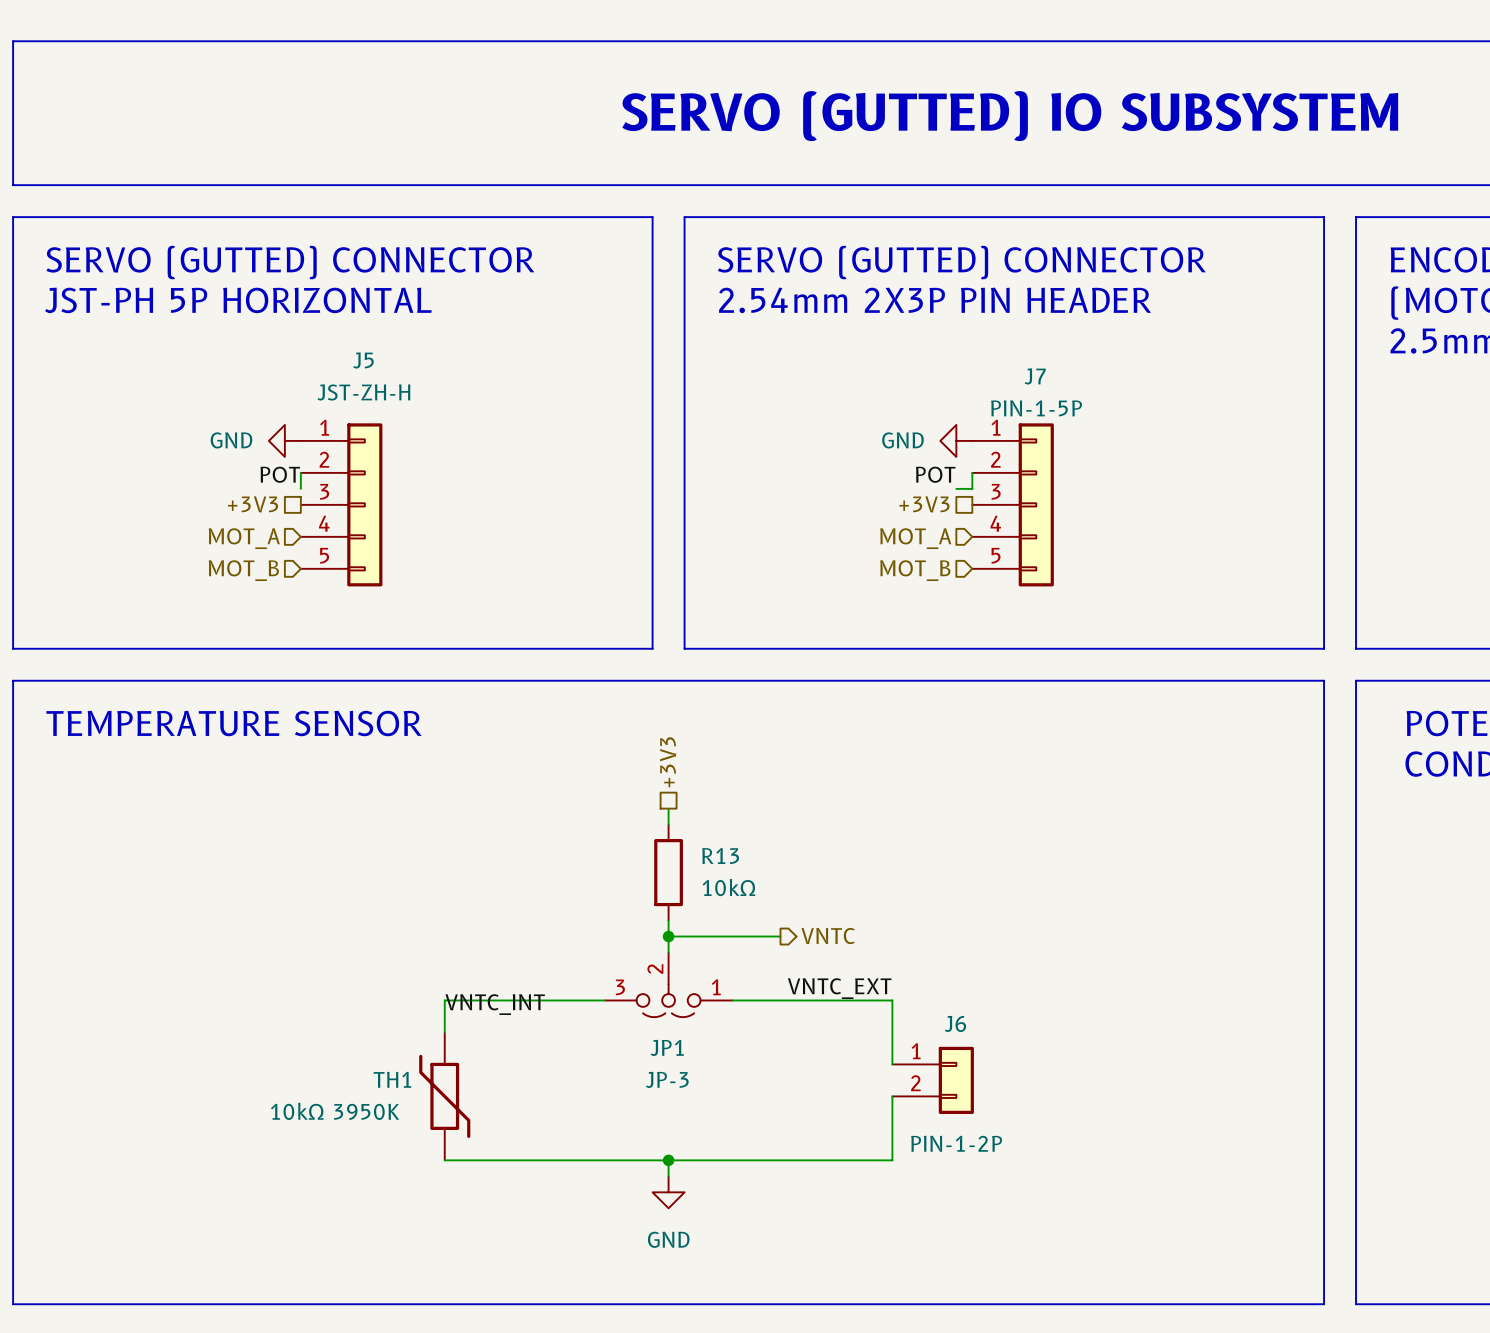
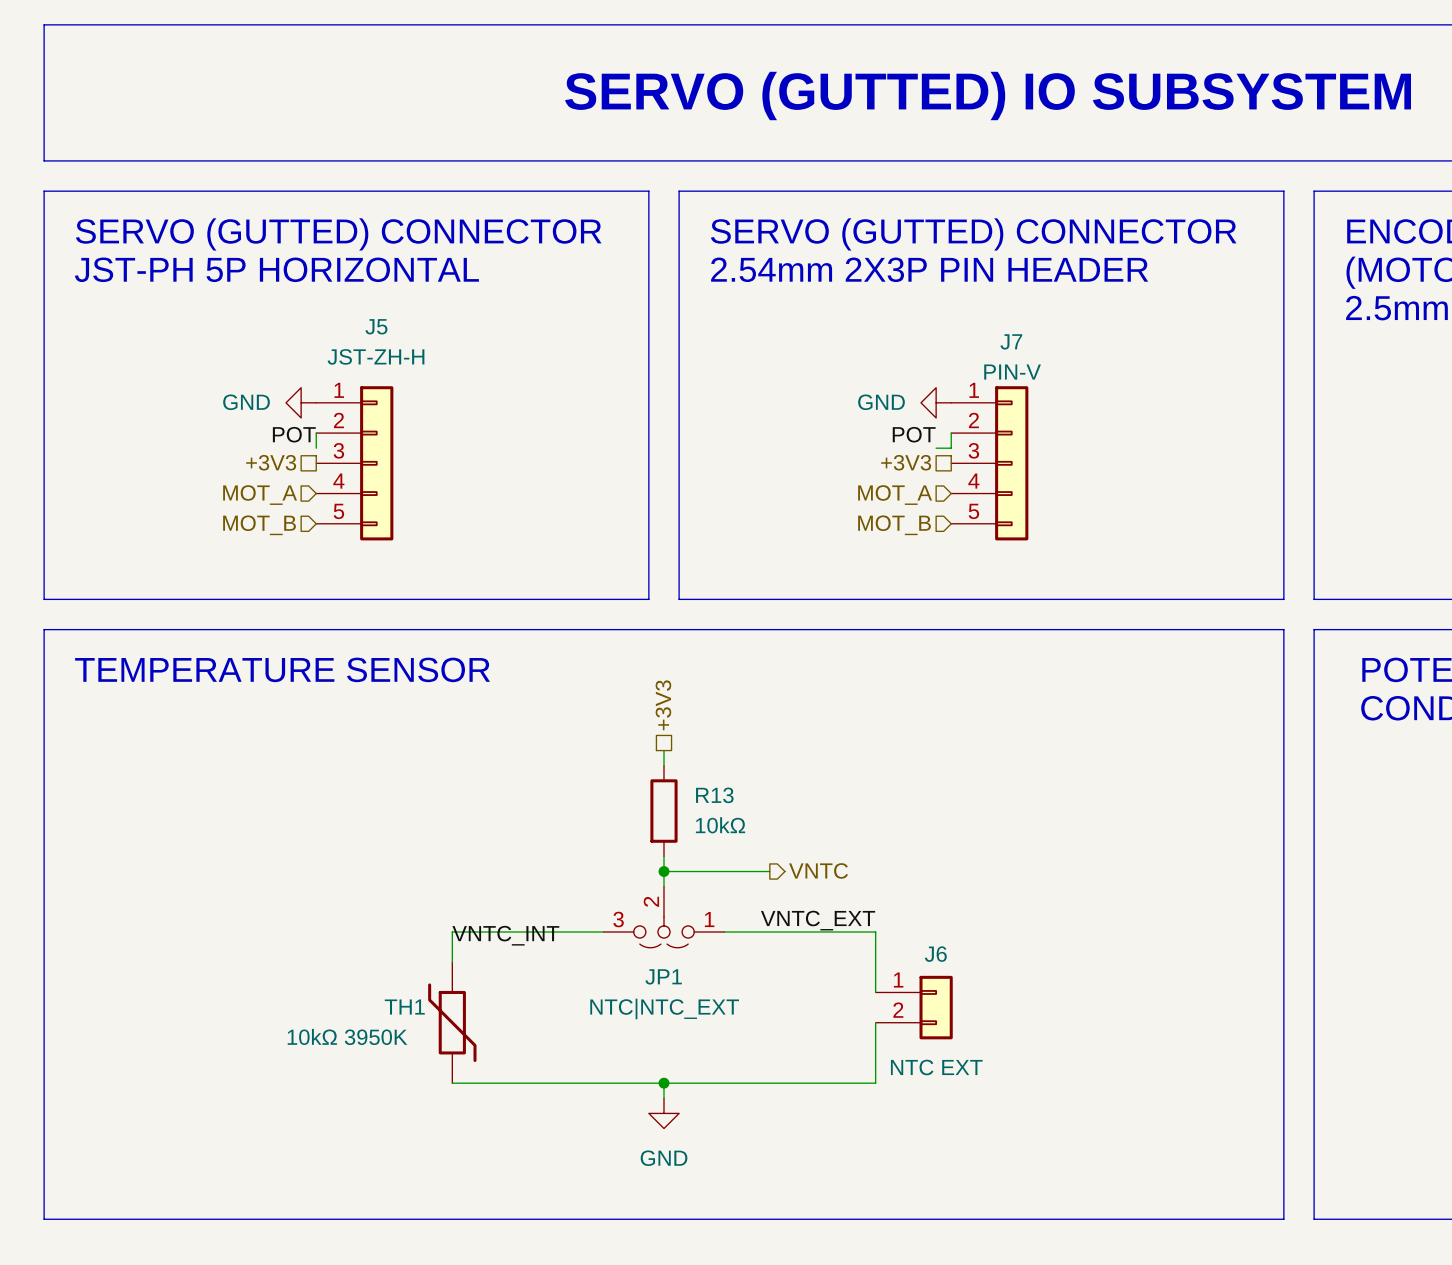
J7 value: PIN-1-5P (1036, 408) -> PIN-V (1012, 372)
JP1 value: JP-3 (667, 1079) -> NTC|NTC_EXT (664, 1008)
J6 value: PIN-1-2P (956, 1143) -> NTC EXT (936, 1067)

